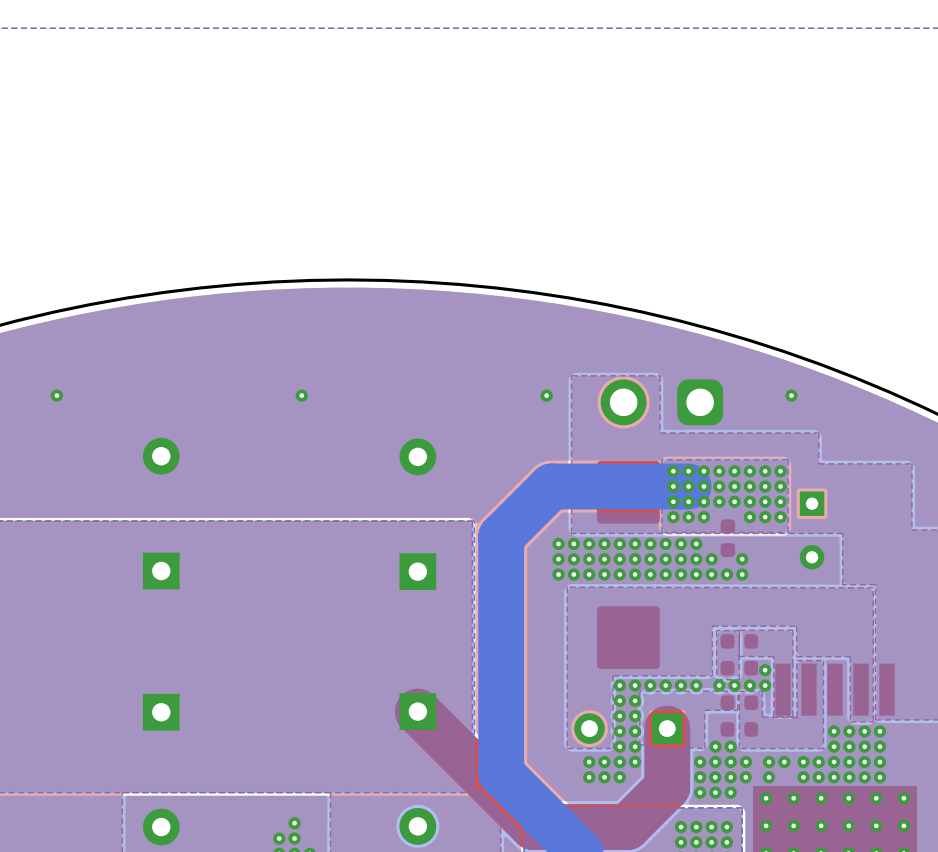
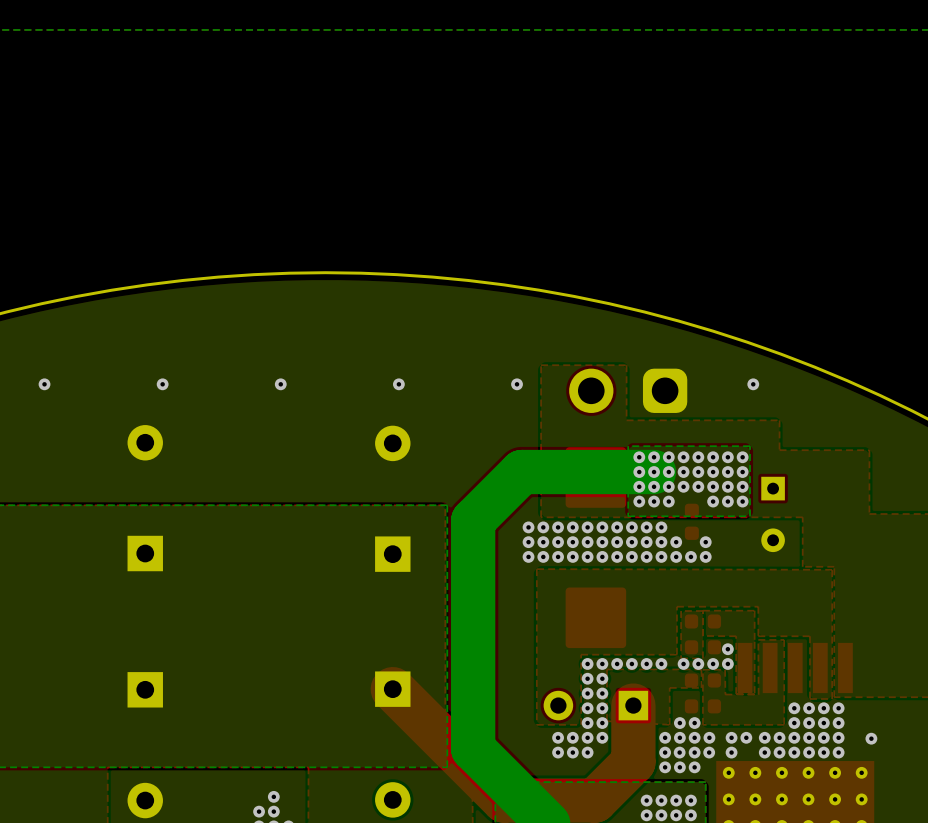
via: none -> (162, 384)
via: none -> (398, 384)
via: none -> (871, 738)

